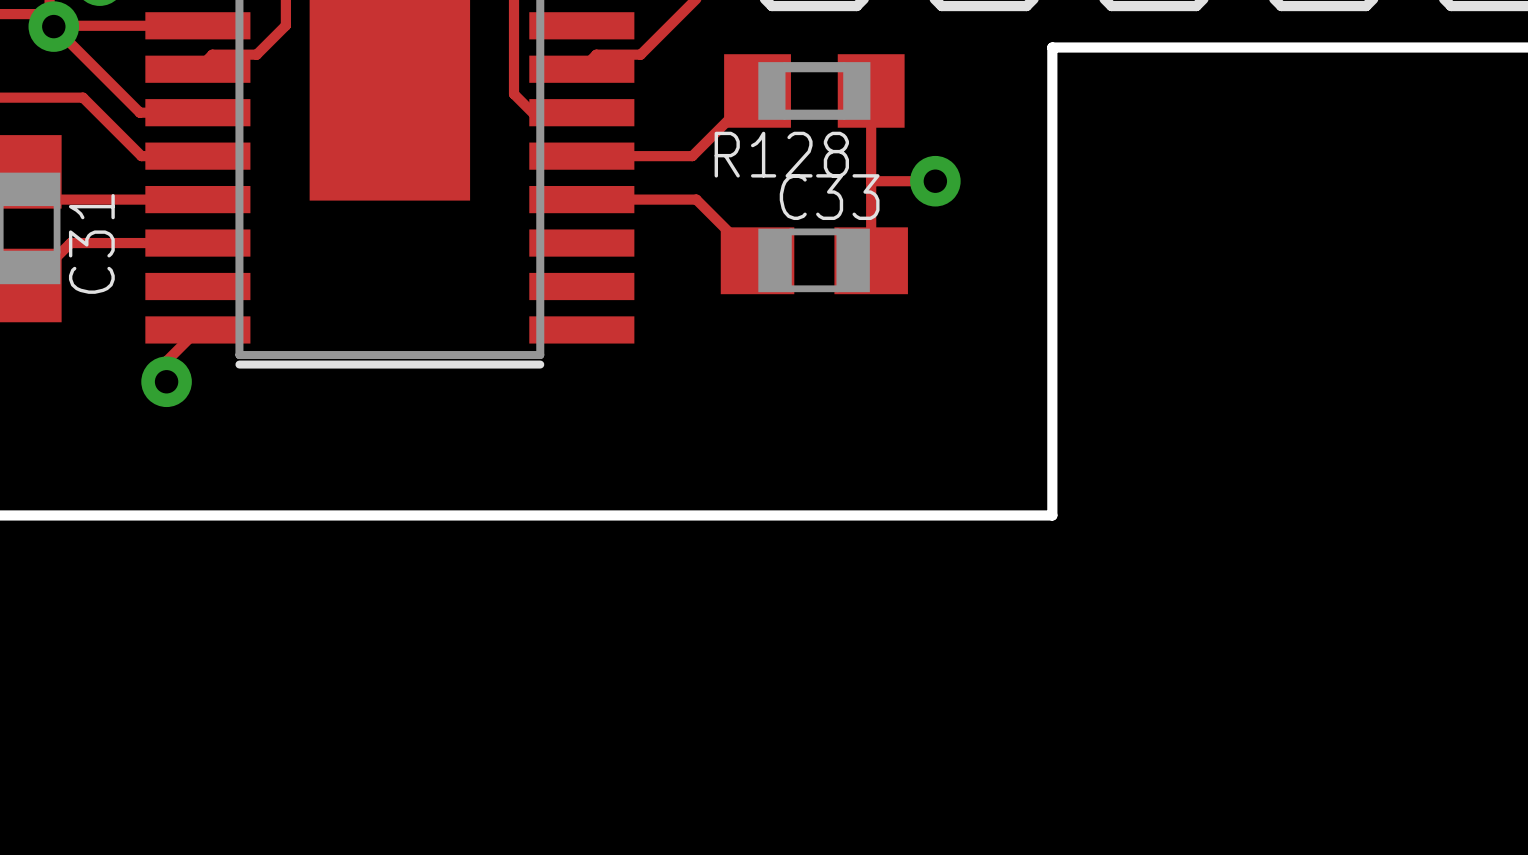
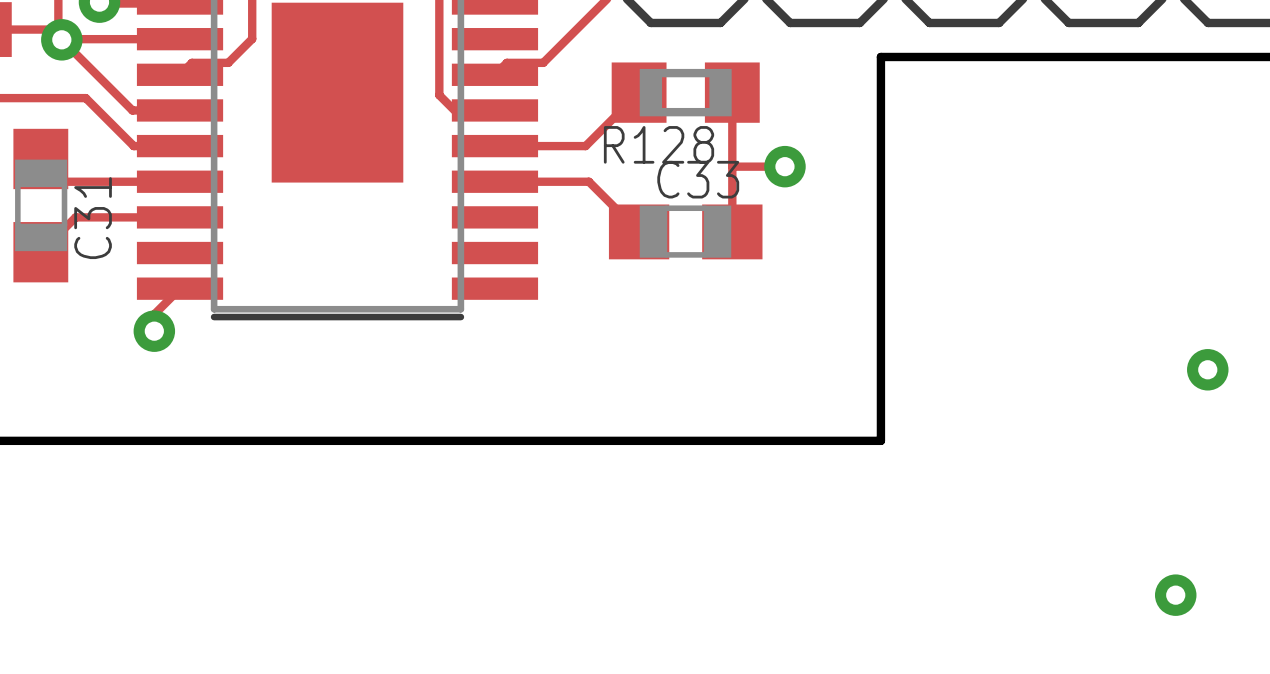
via: none -> (1207, 369)
via: none -> (1175, 595)

